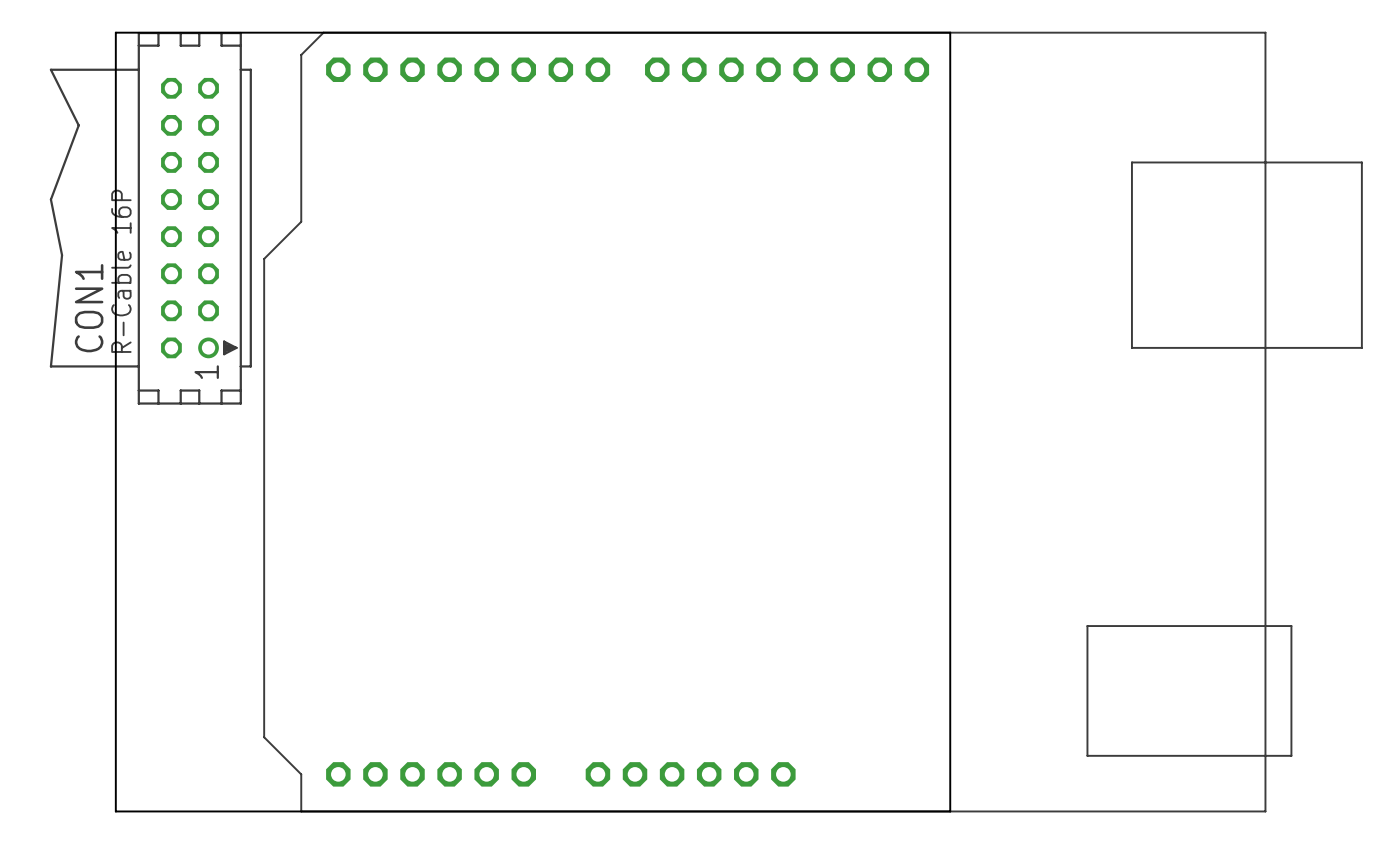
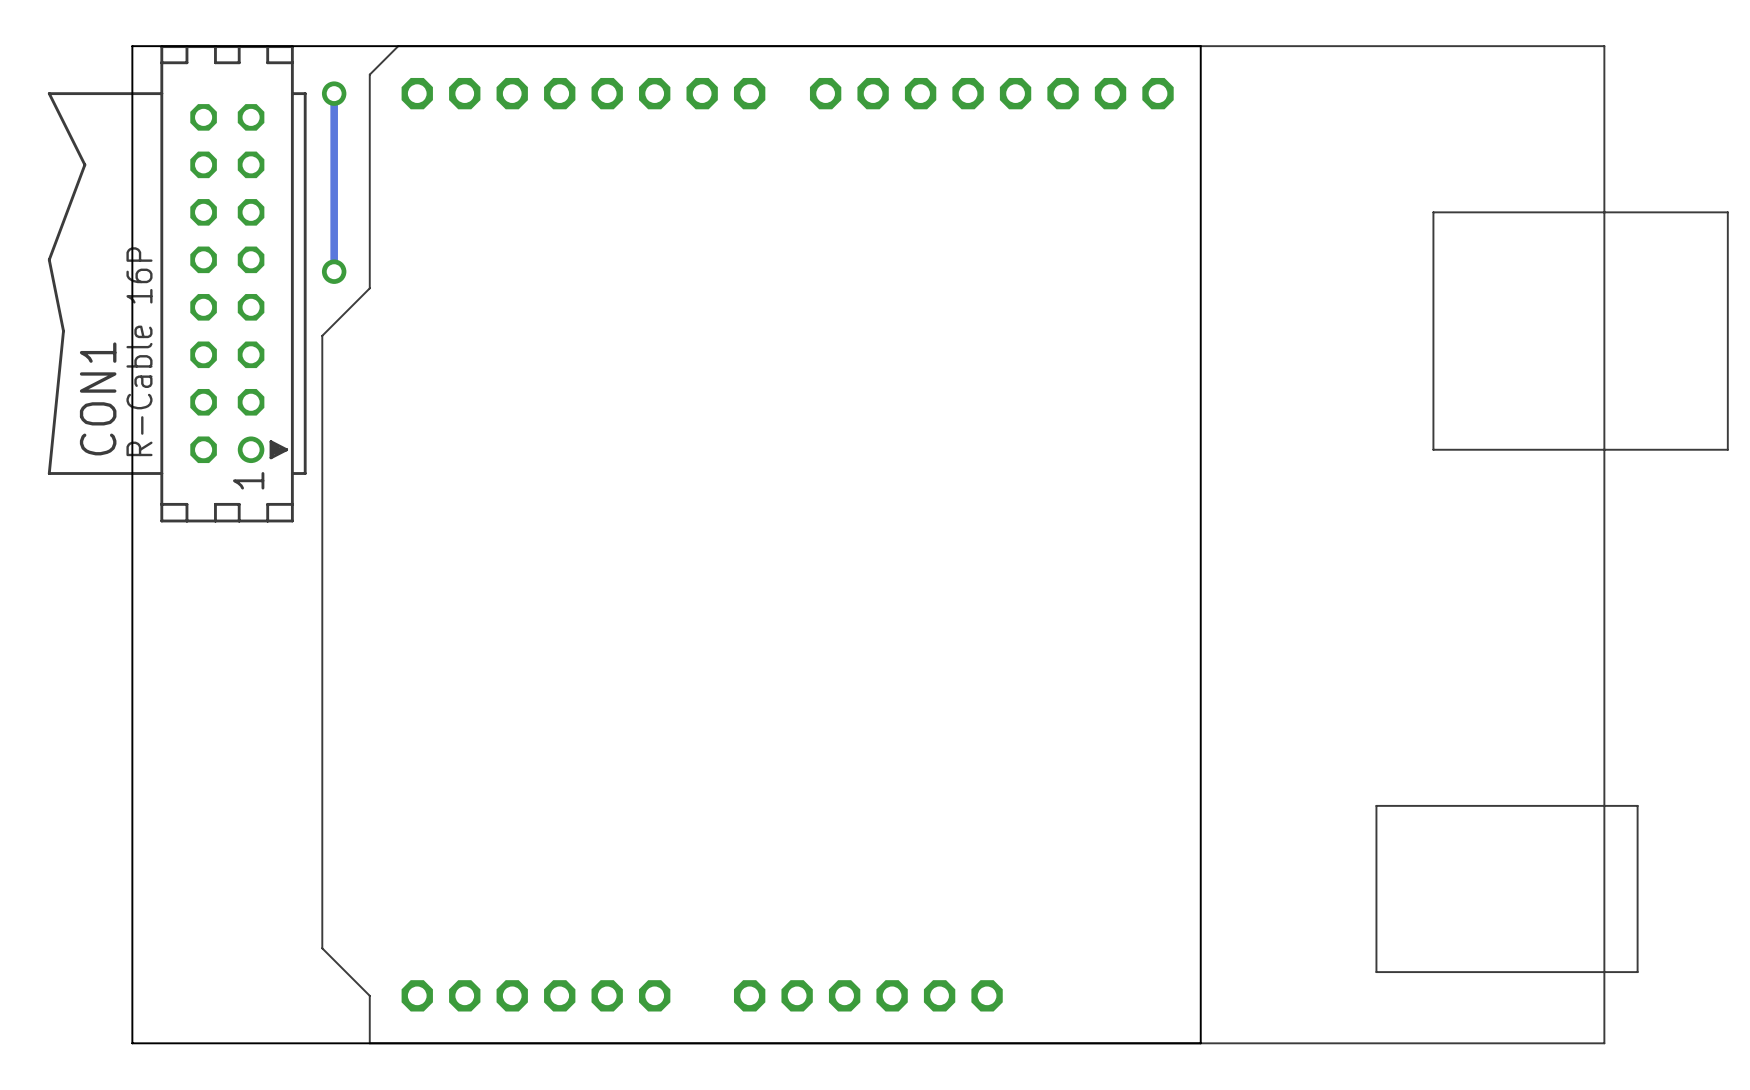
track: none -> (334, 93) (334, 271)
via: none -> (334, 93)
via: none -> (334, 271)

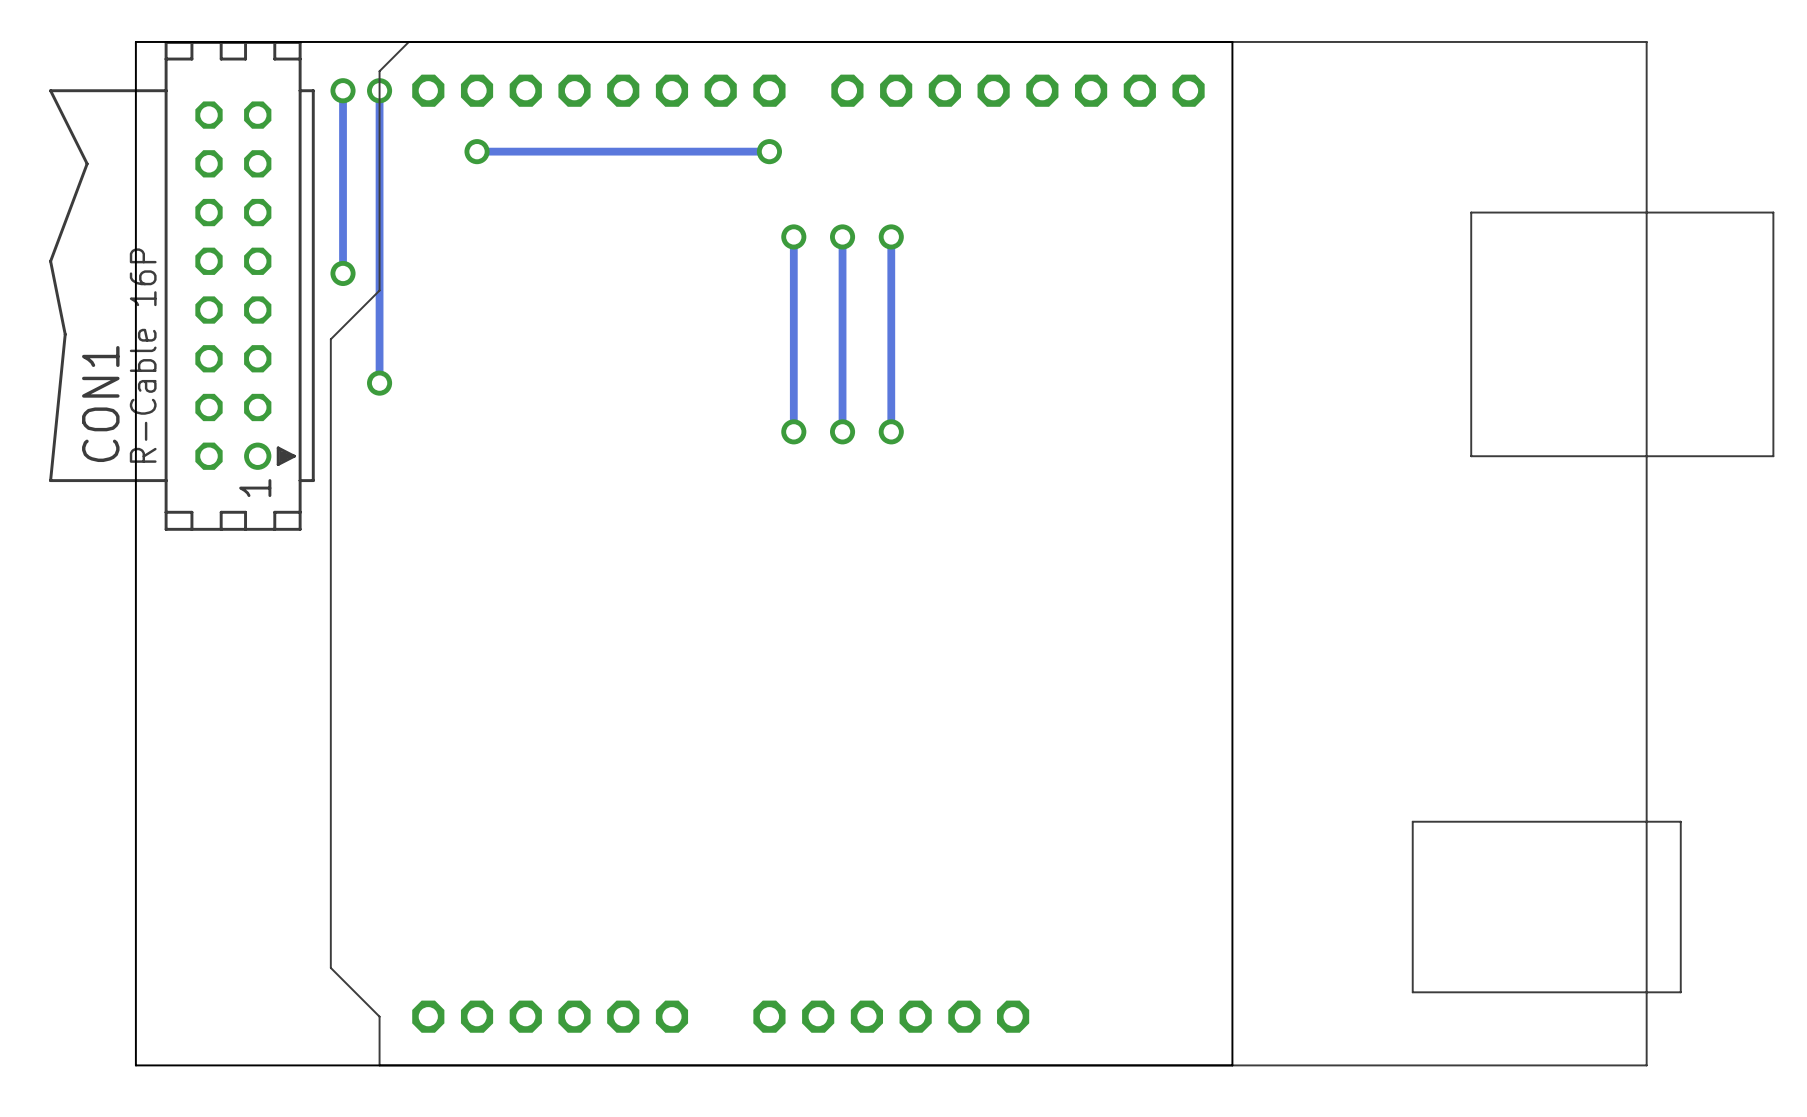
track: none -> (379, 90) (379, 383)
via: none -> (379, 90)
via: none -> (477, 151)
track: none -> (769, 151) (477, 151)
via: none -> (769, 151)
track: none -> (793, 236) (793, 431)
via: none -> (793, 236)
track: none -> (842, 236) (842, 431)
via: none -> (842, 236)
track: none -> (891, 236) (891, 431)
via: none -> (891, 236)
via: none -> (379, 383)
via: none -> (793, 431)
via: none -> (842, 431)
via: none -> (891, 431)

